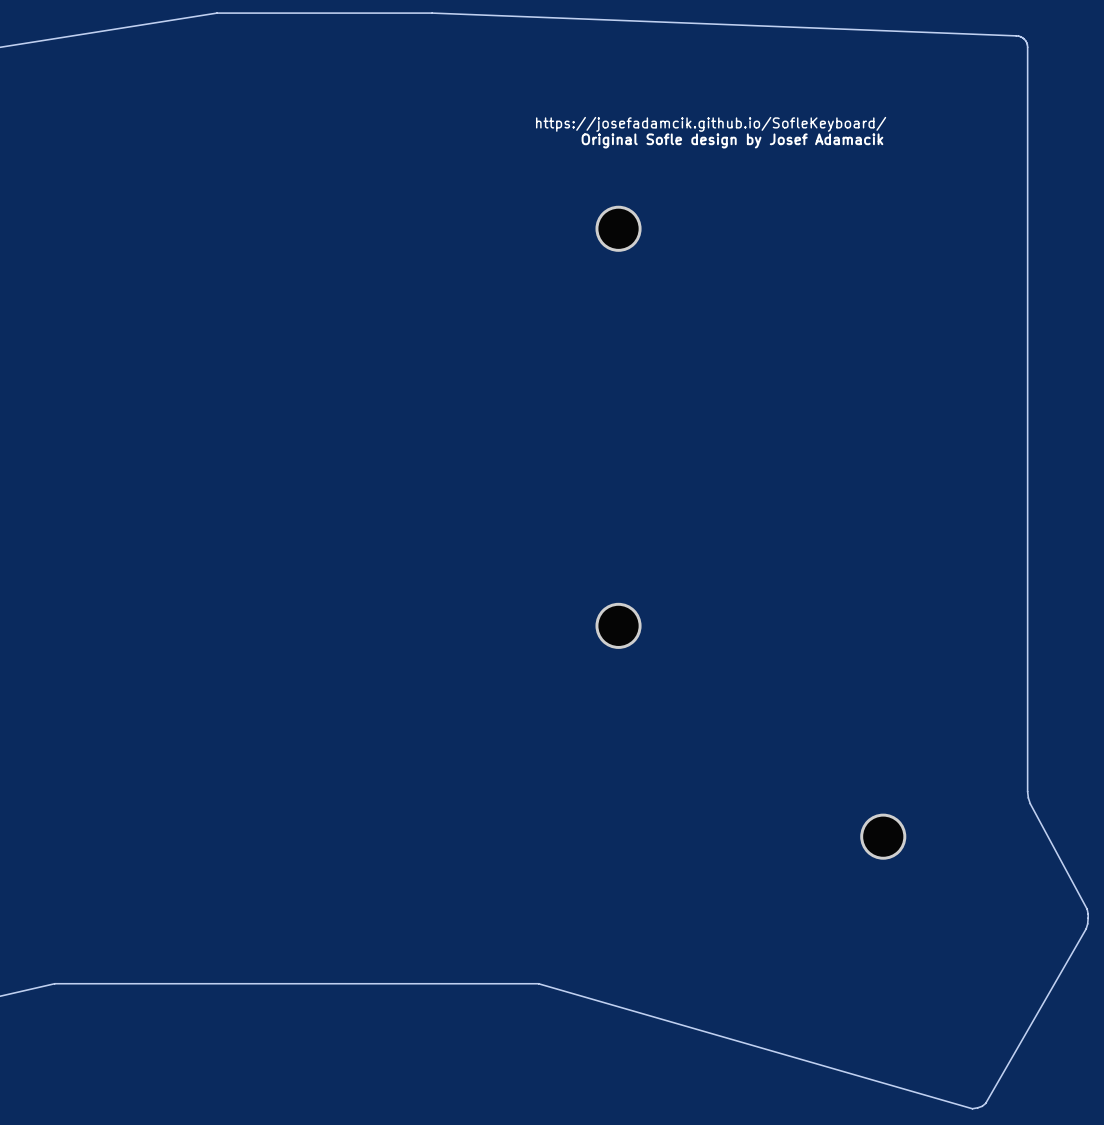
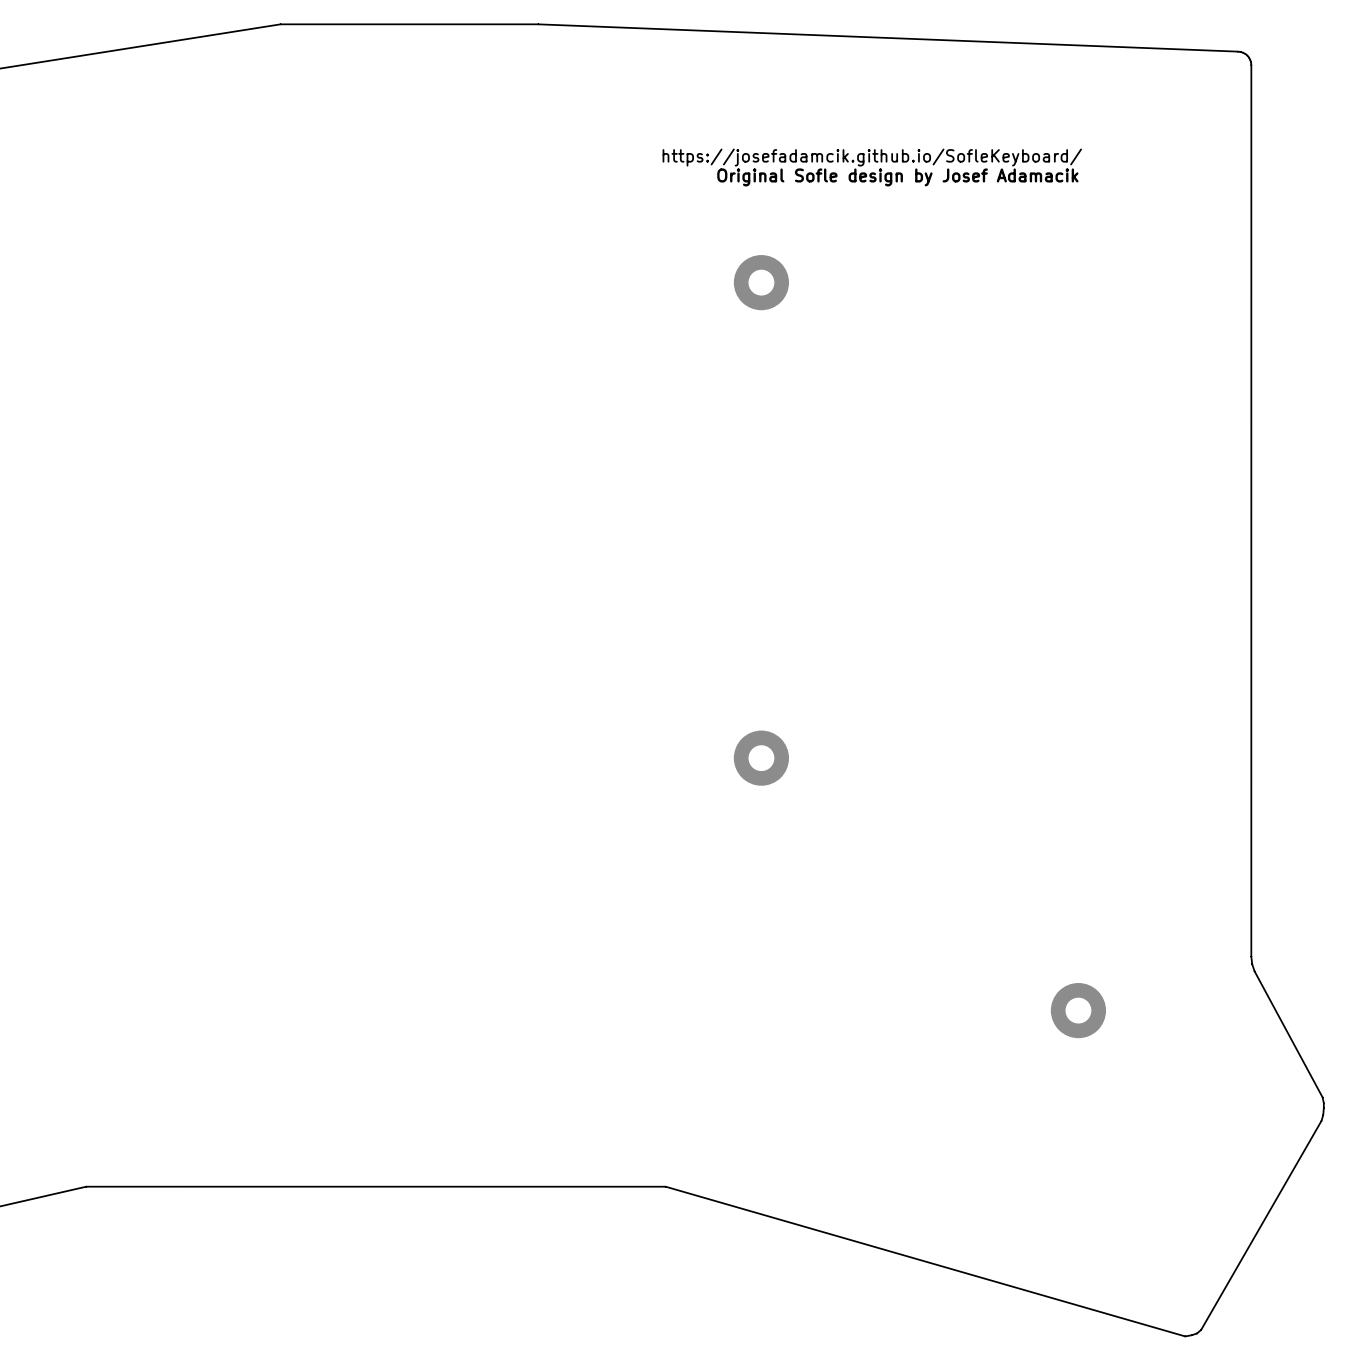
part footprint: [595, 205, 642, 252] -> [733, 255, 790, 311]
part footprint: [595, 602, 642, 649] -> [733, 730, 790, 786]
part footprint: [860, 813, 907, 860] -> [1050, 983, 1107, 1039]

